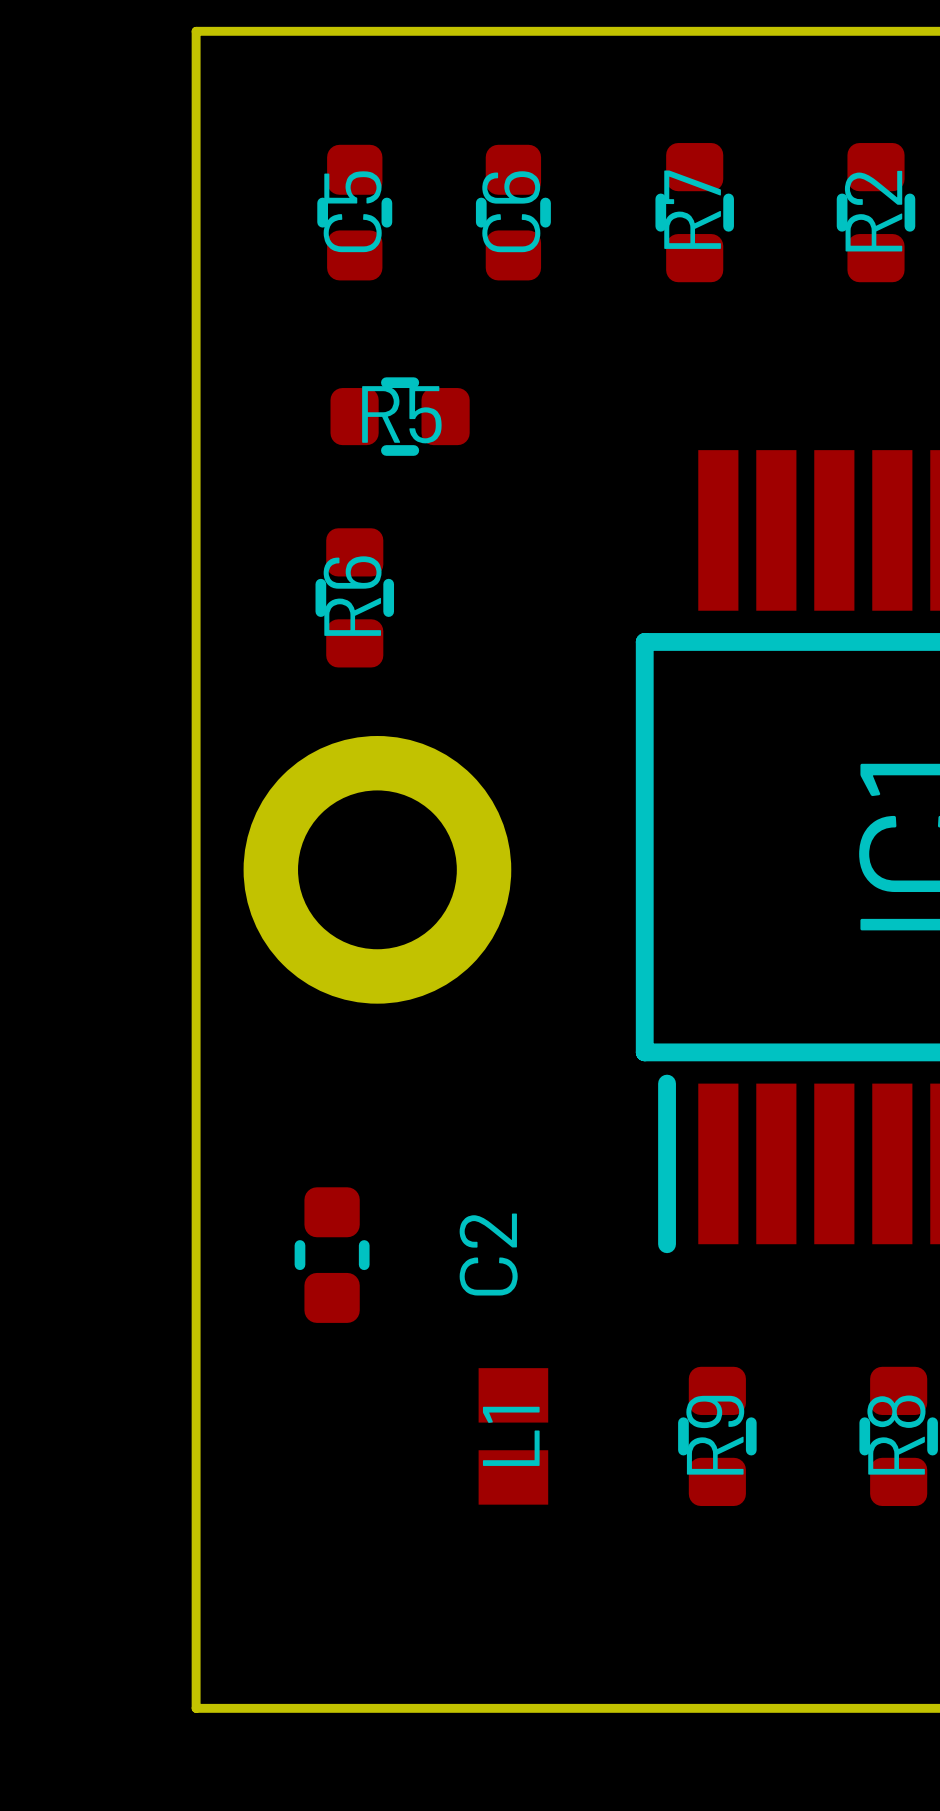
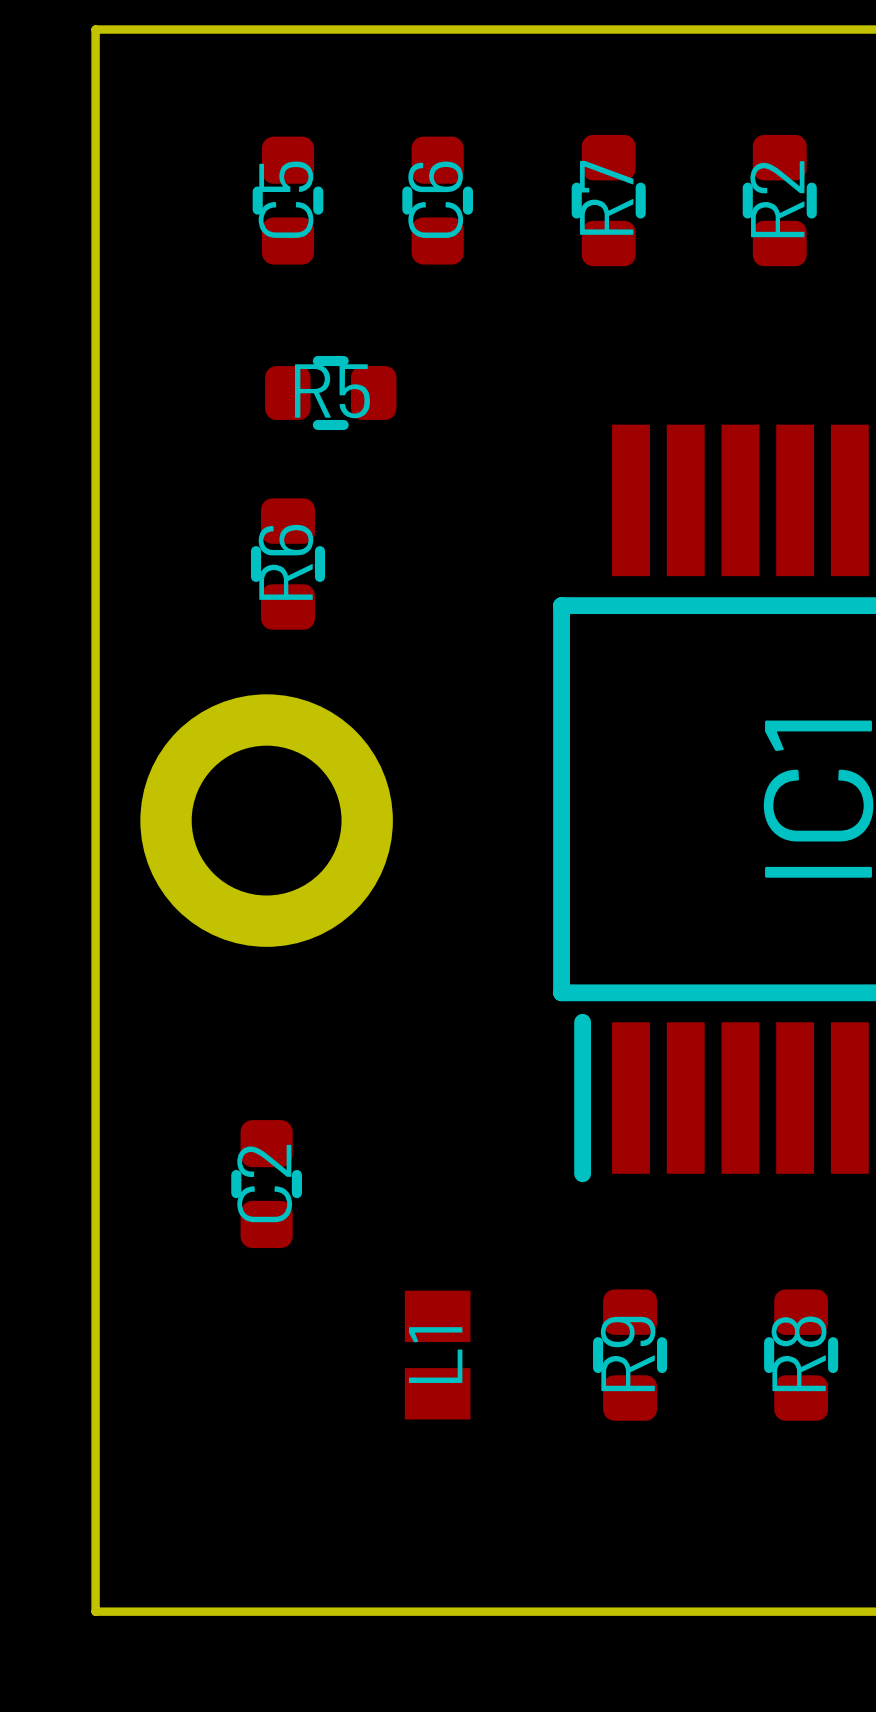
board edge: (196, 31) (196, 1708) -> (138, 29) (95, 29) (95, 1611) (138, 1611)
part position: (377, 869) -> (266, 820)
C2 name position: C2 (488, 1254) -> C2 (264, 1183)

